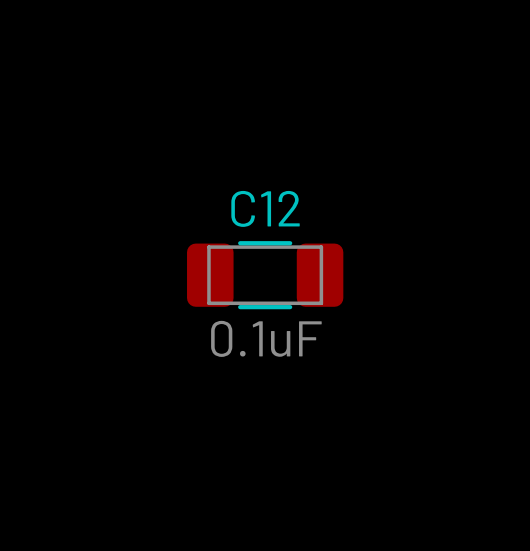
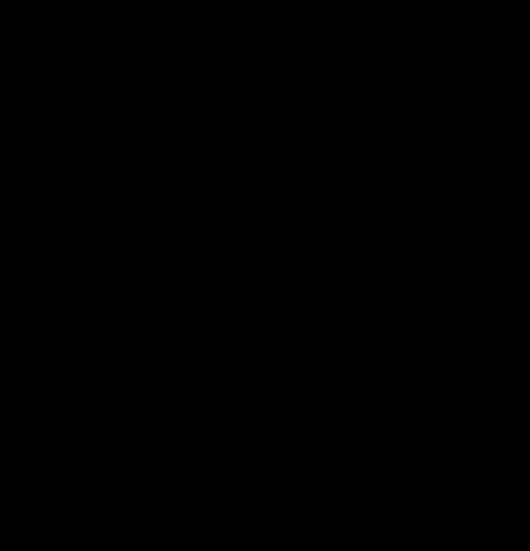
C12: 0.1uF (265, 275) -> none

